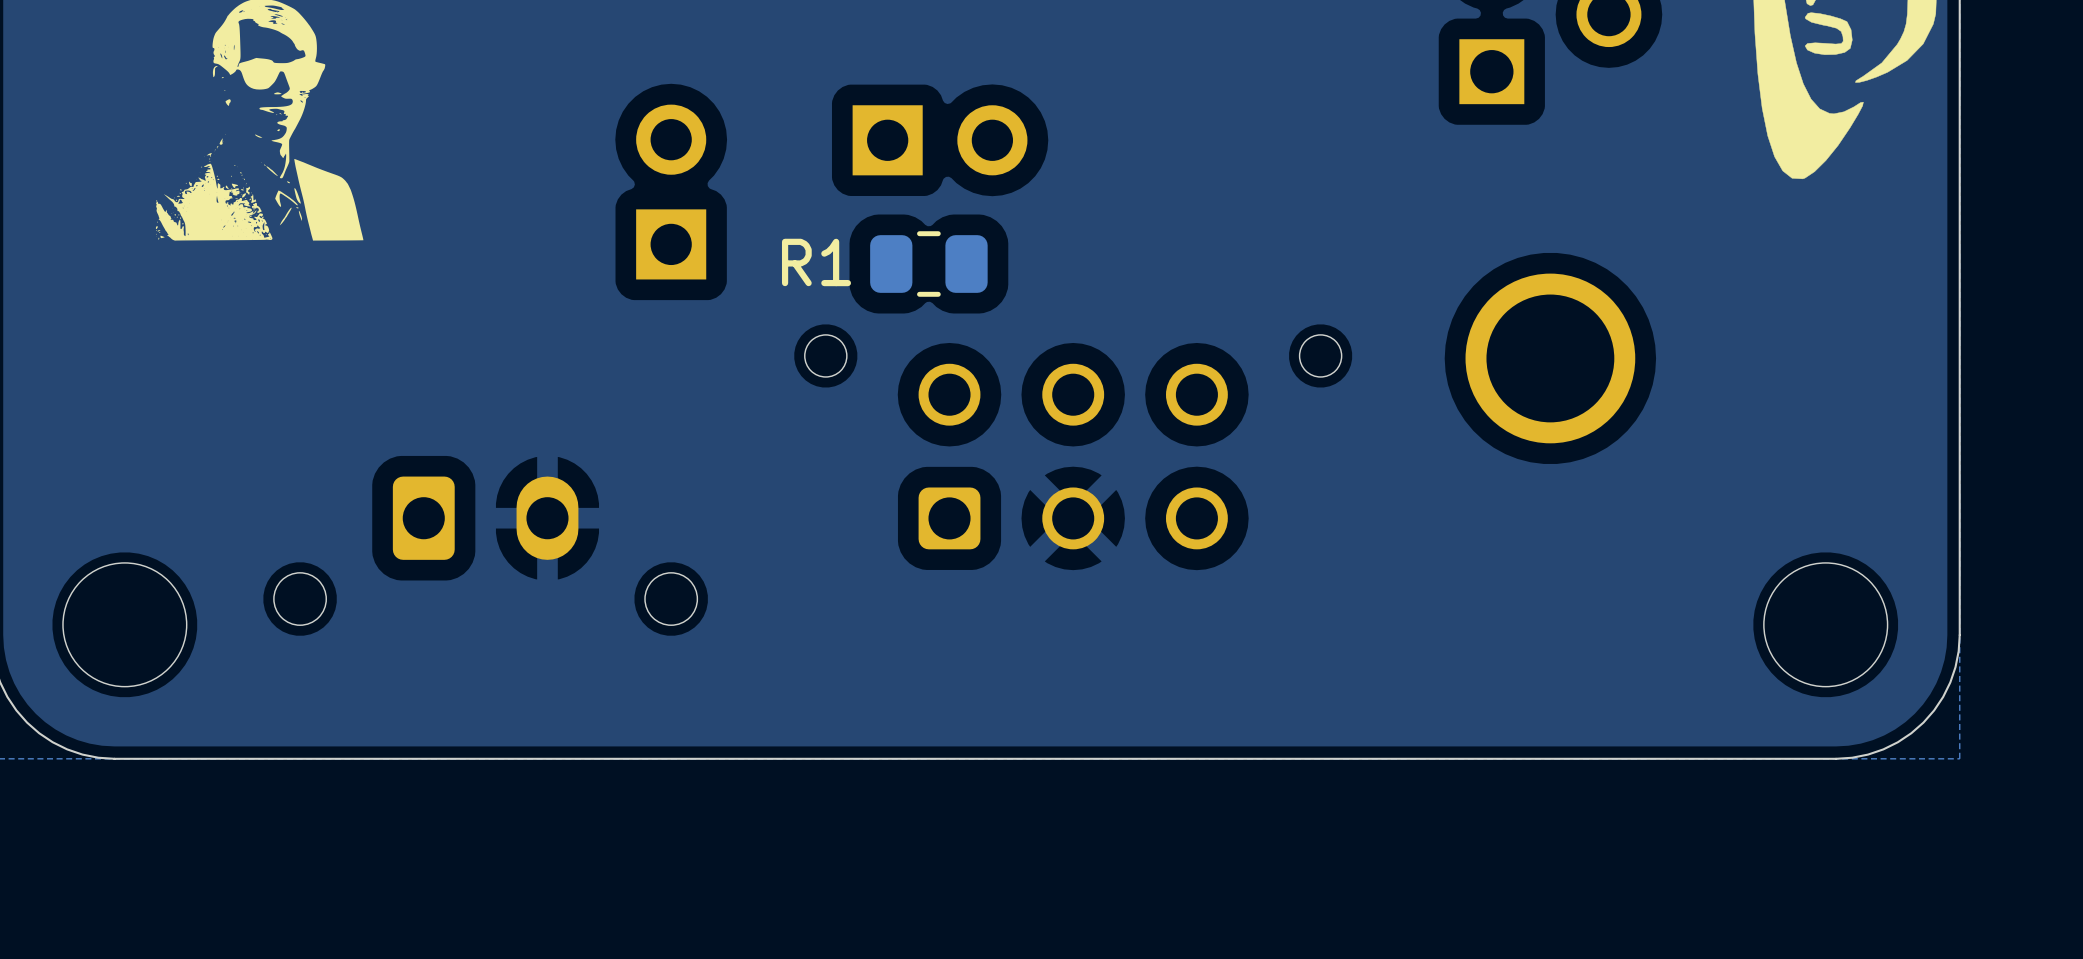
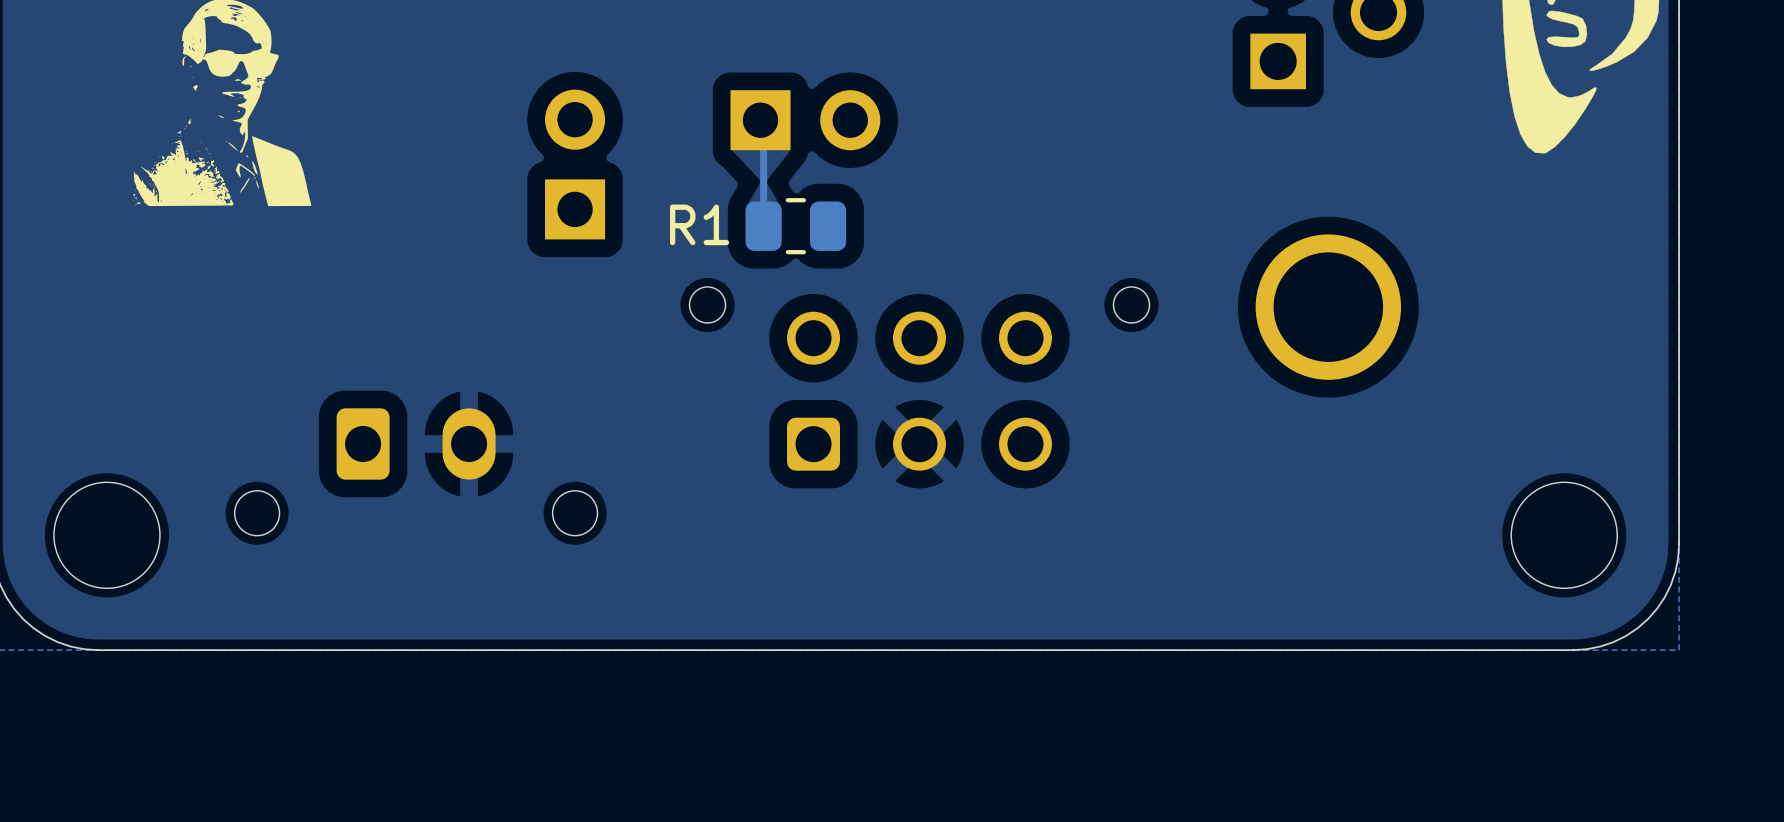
track: none -> (760, 120) (763, 123) (763, 226)

